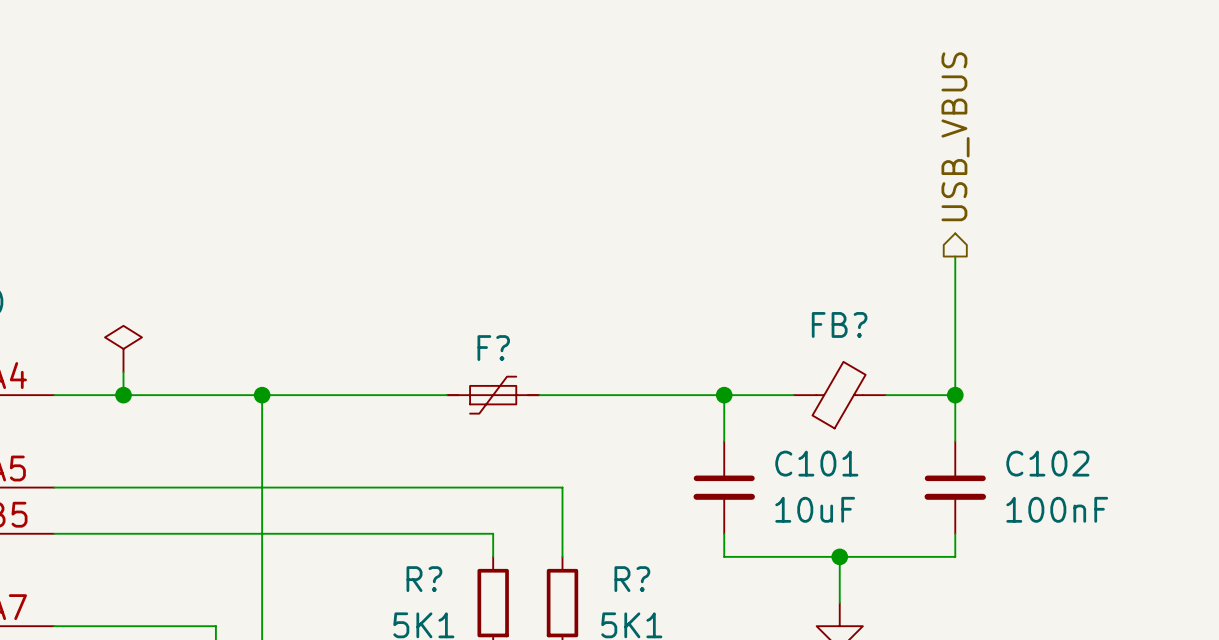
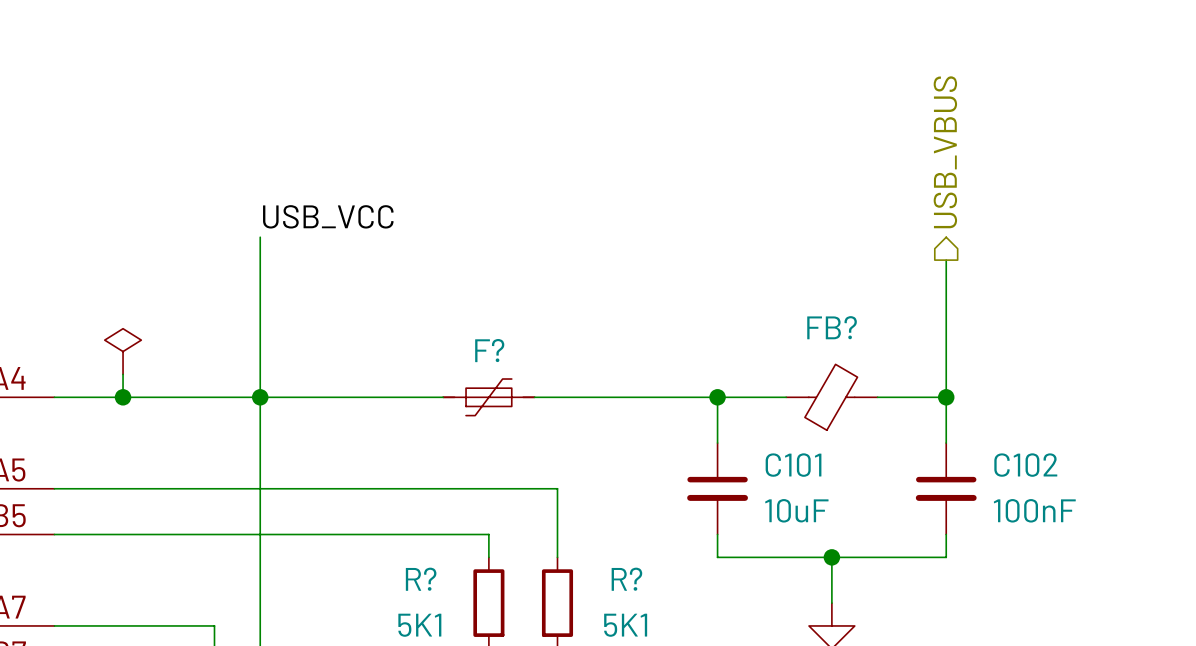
label: none -> USB_VCC (328, 216)
wire: none -> (260, 237) (260, 397)

